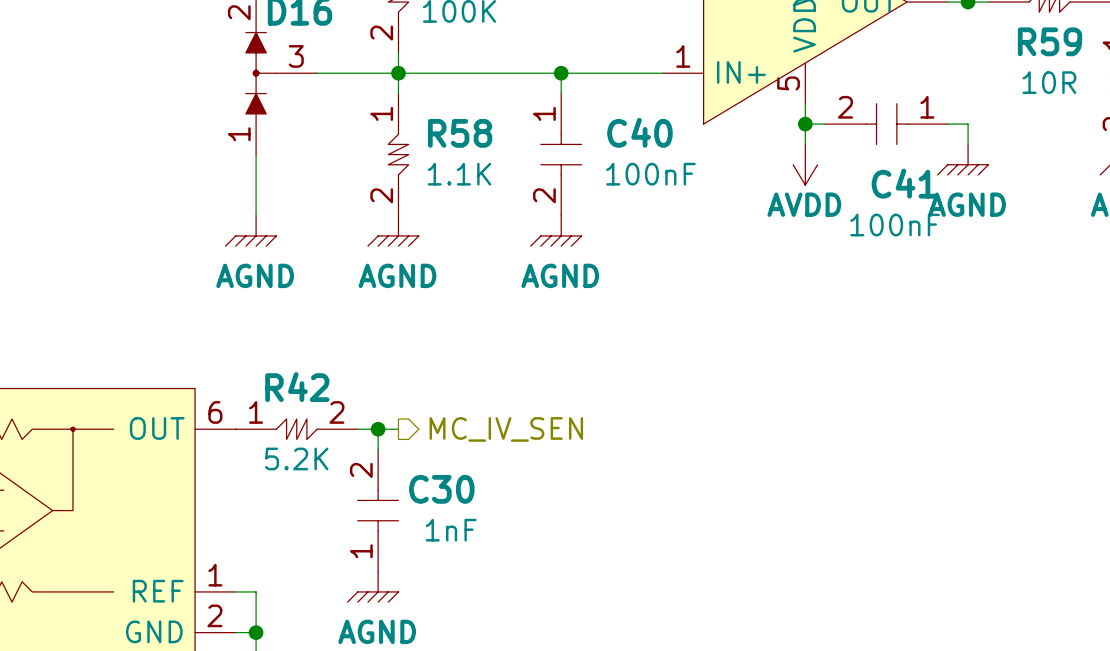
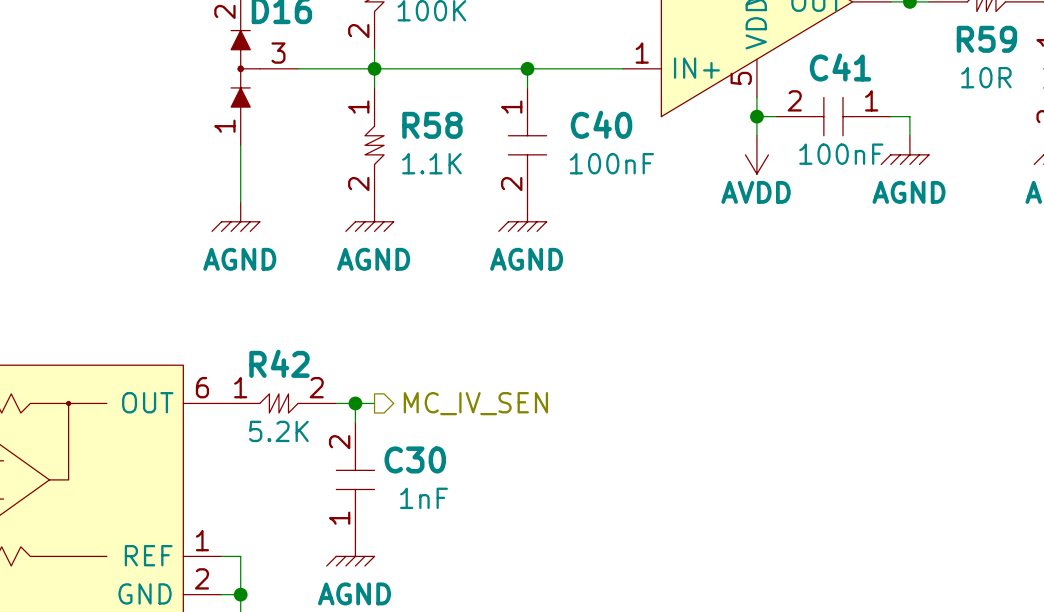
C41 name position: C41 (904, 183) -> C41 (840, 67)
C41 value position: 100nF (895, 225) -> 100nF (841, 154)

